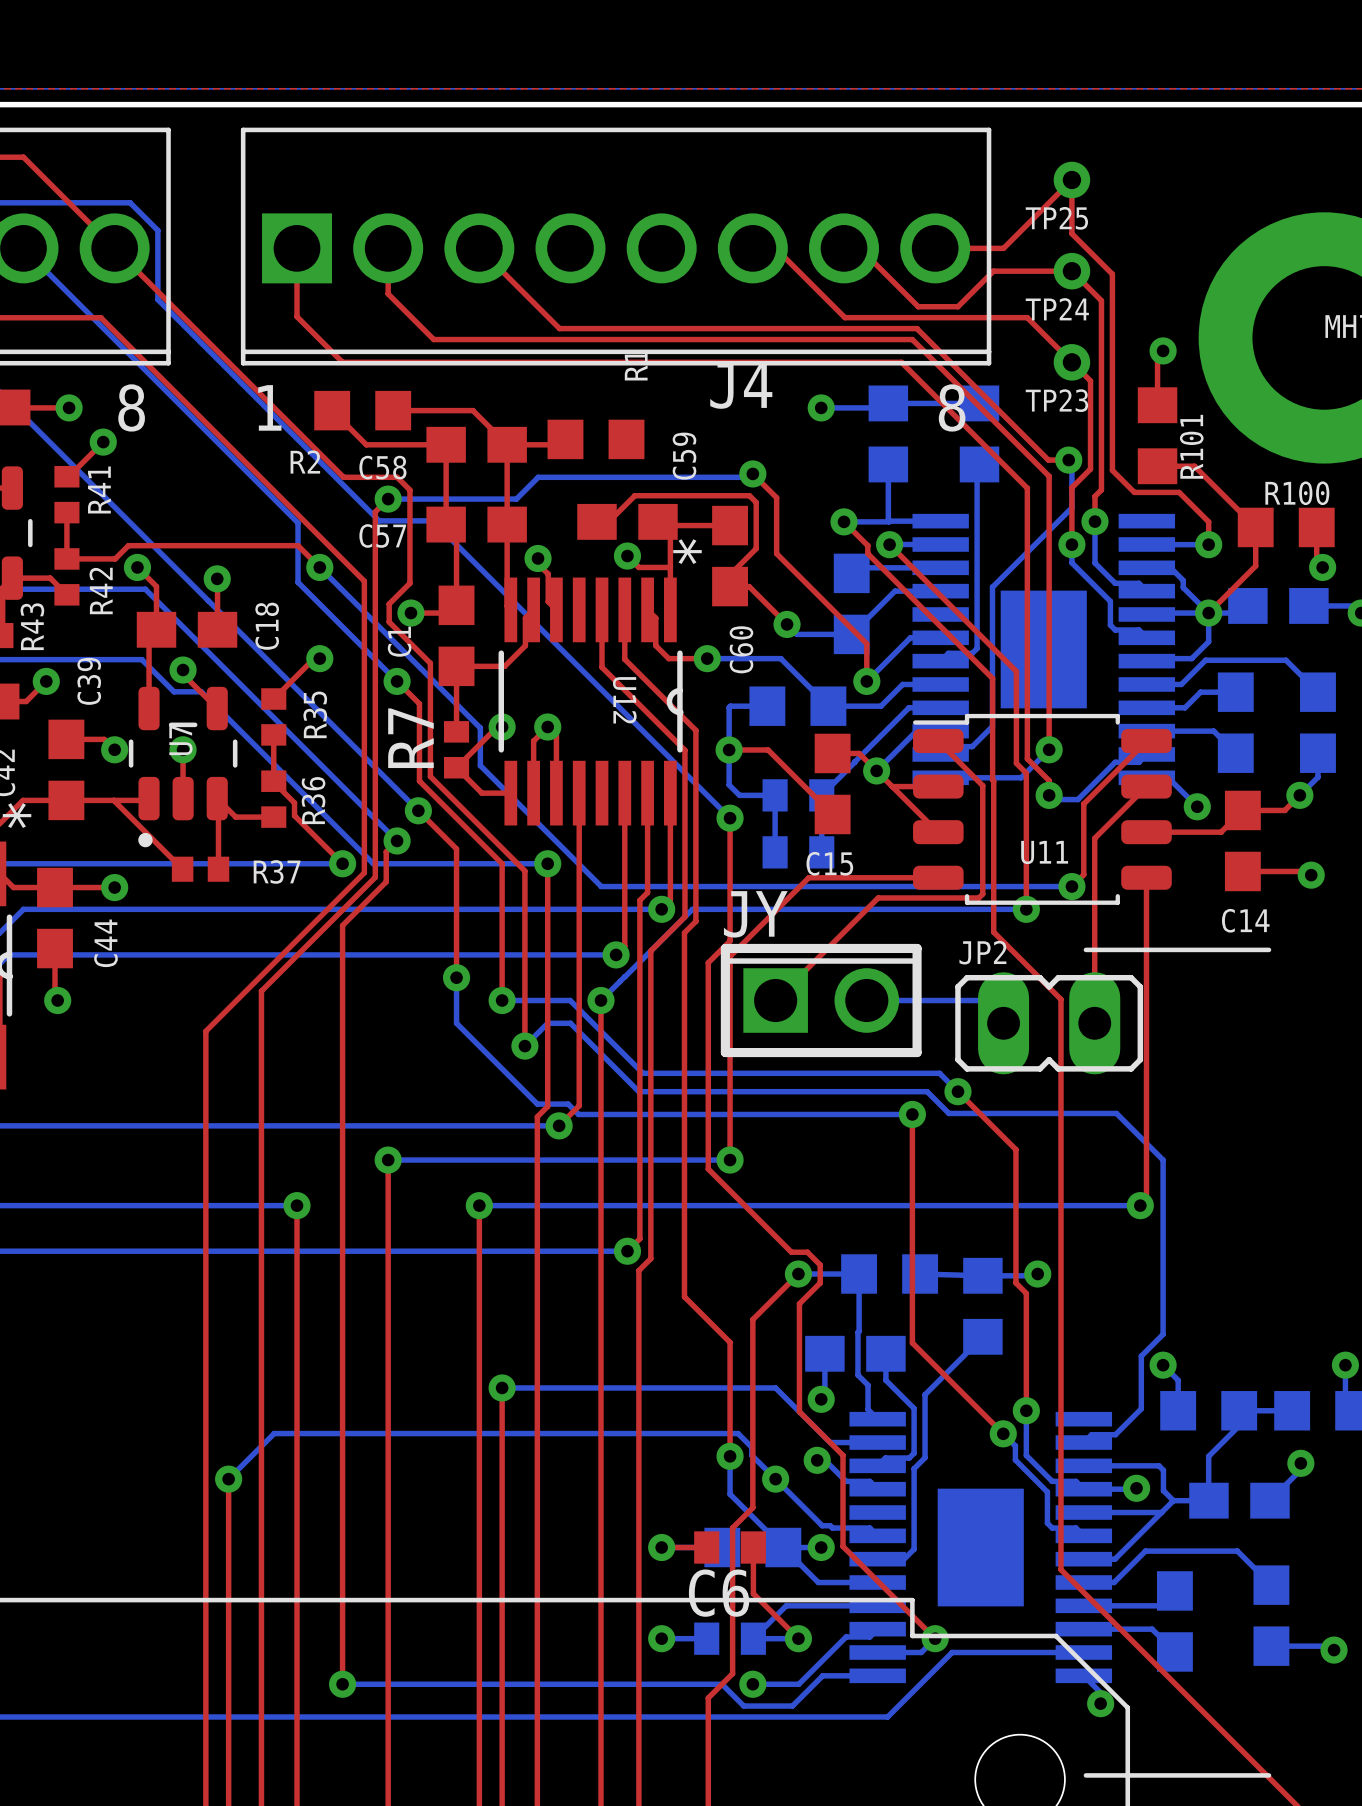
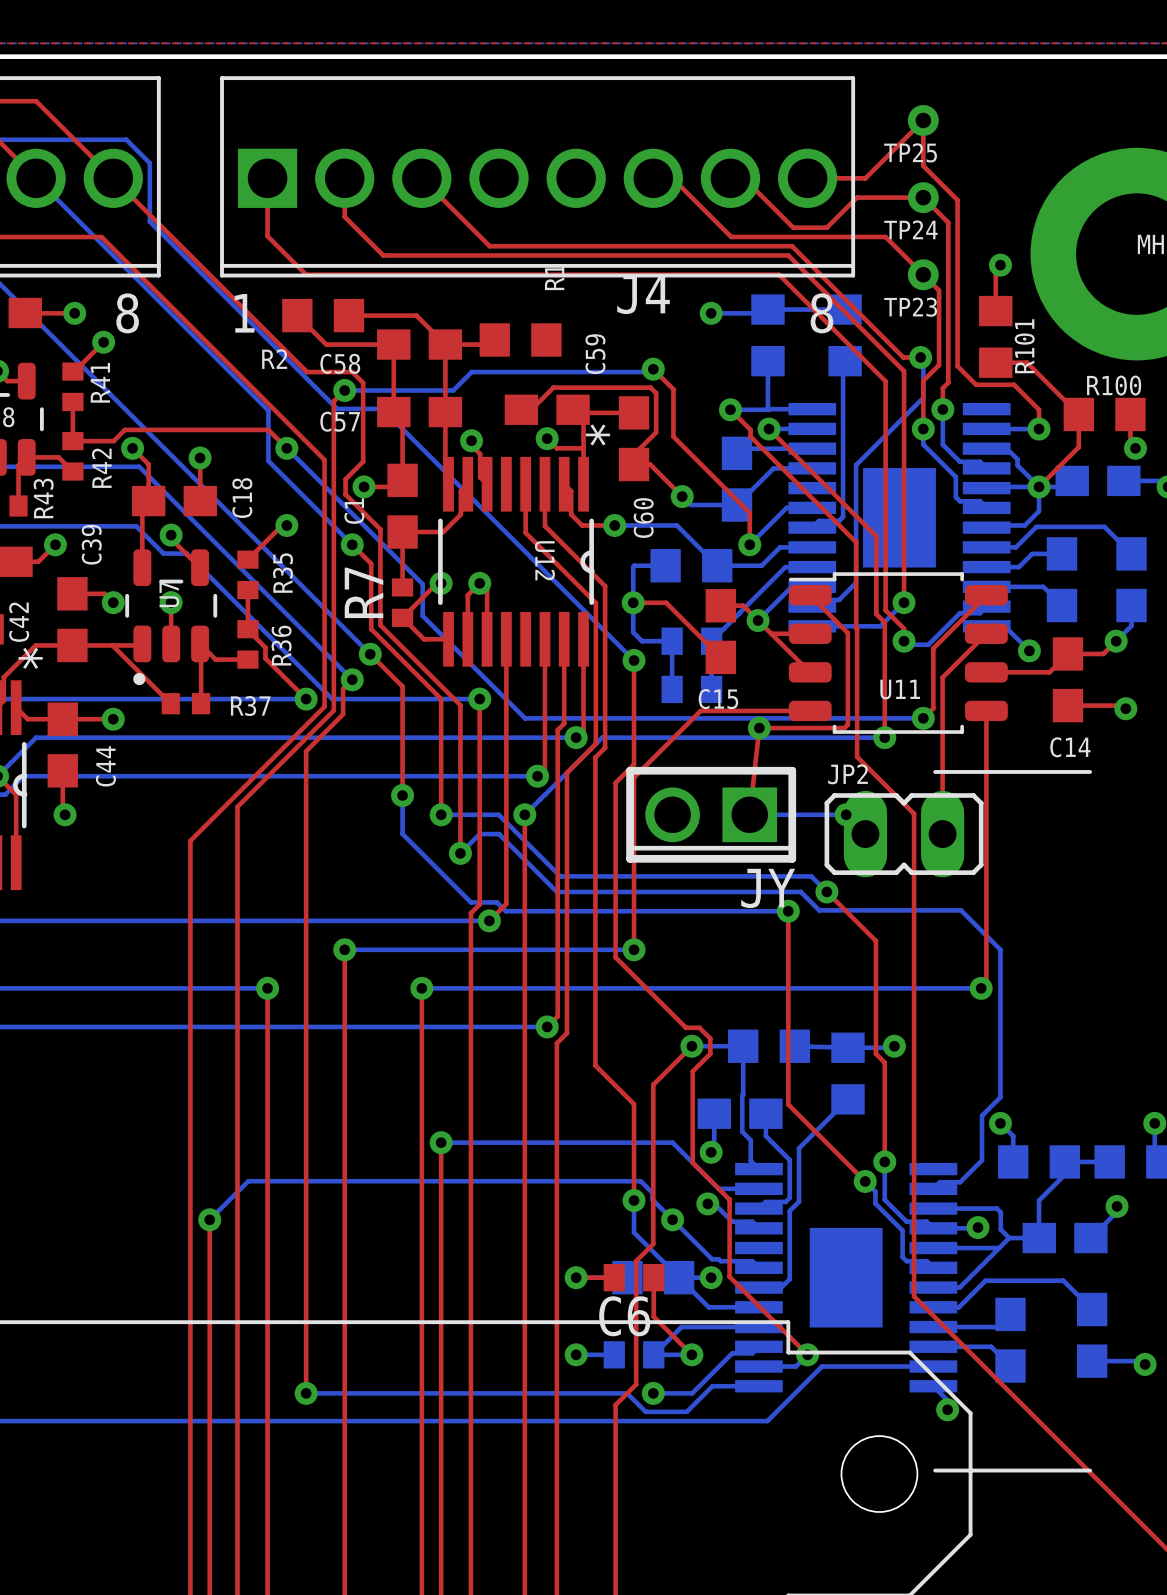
top track: (878, 897) (775, 1000) -> (759, 728) (749, 814)
via: none -> (759, 728)
JY rotation: 0° (821, 1000) -> 180° (711, 814)
via: none -> (846, 814)

